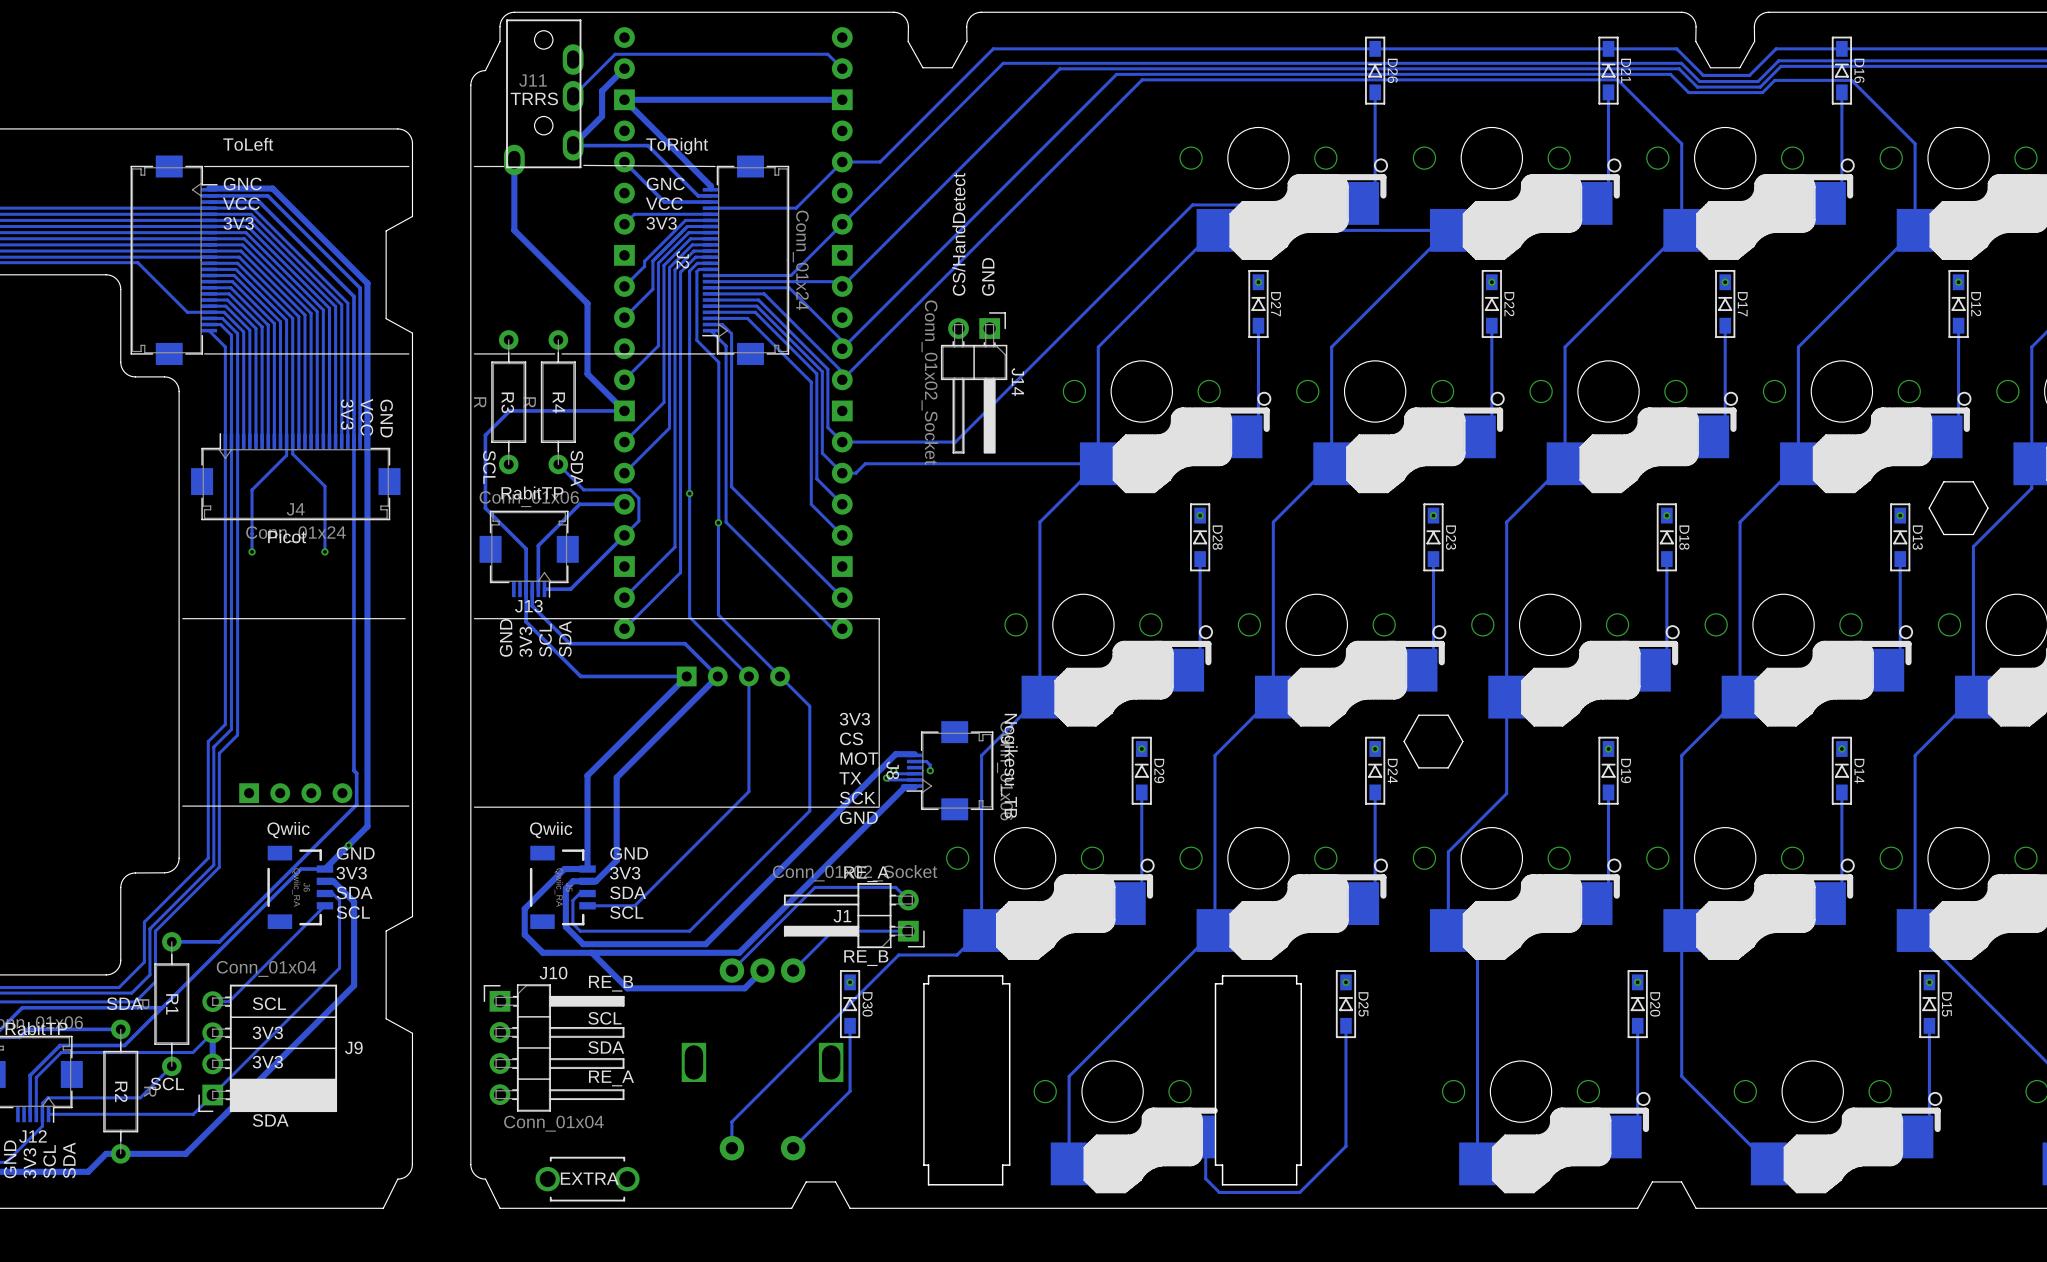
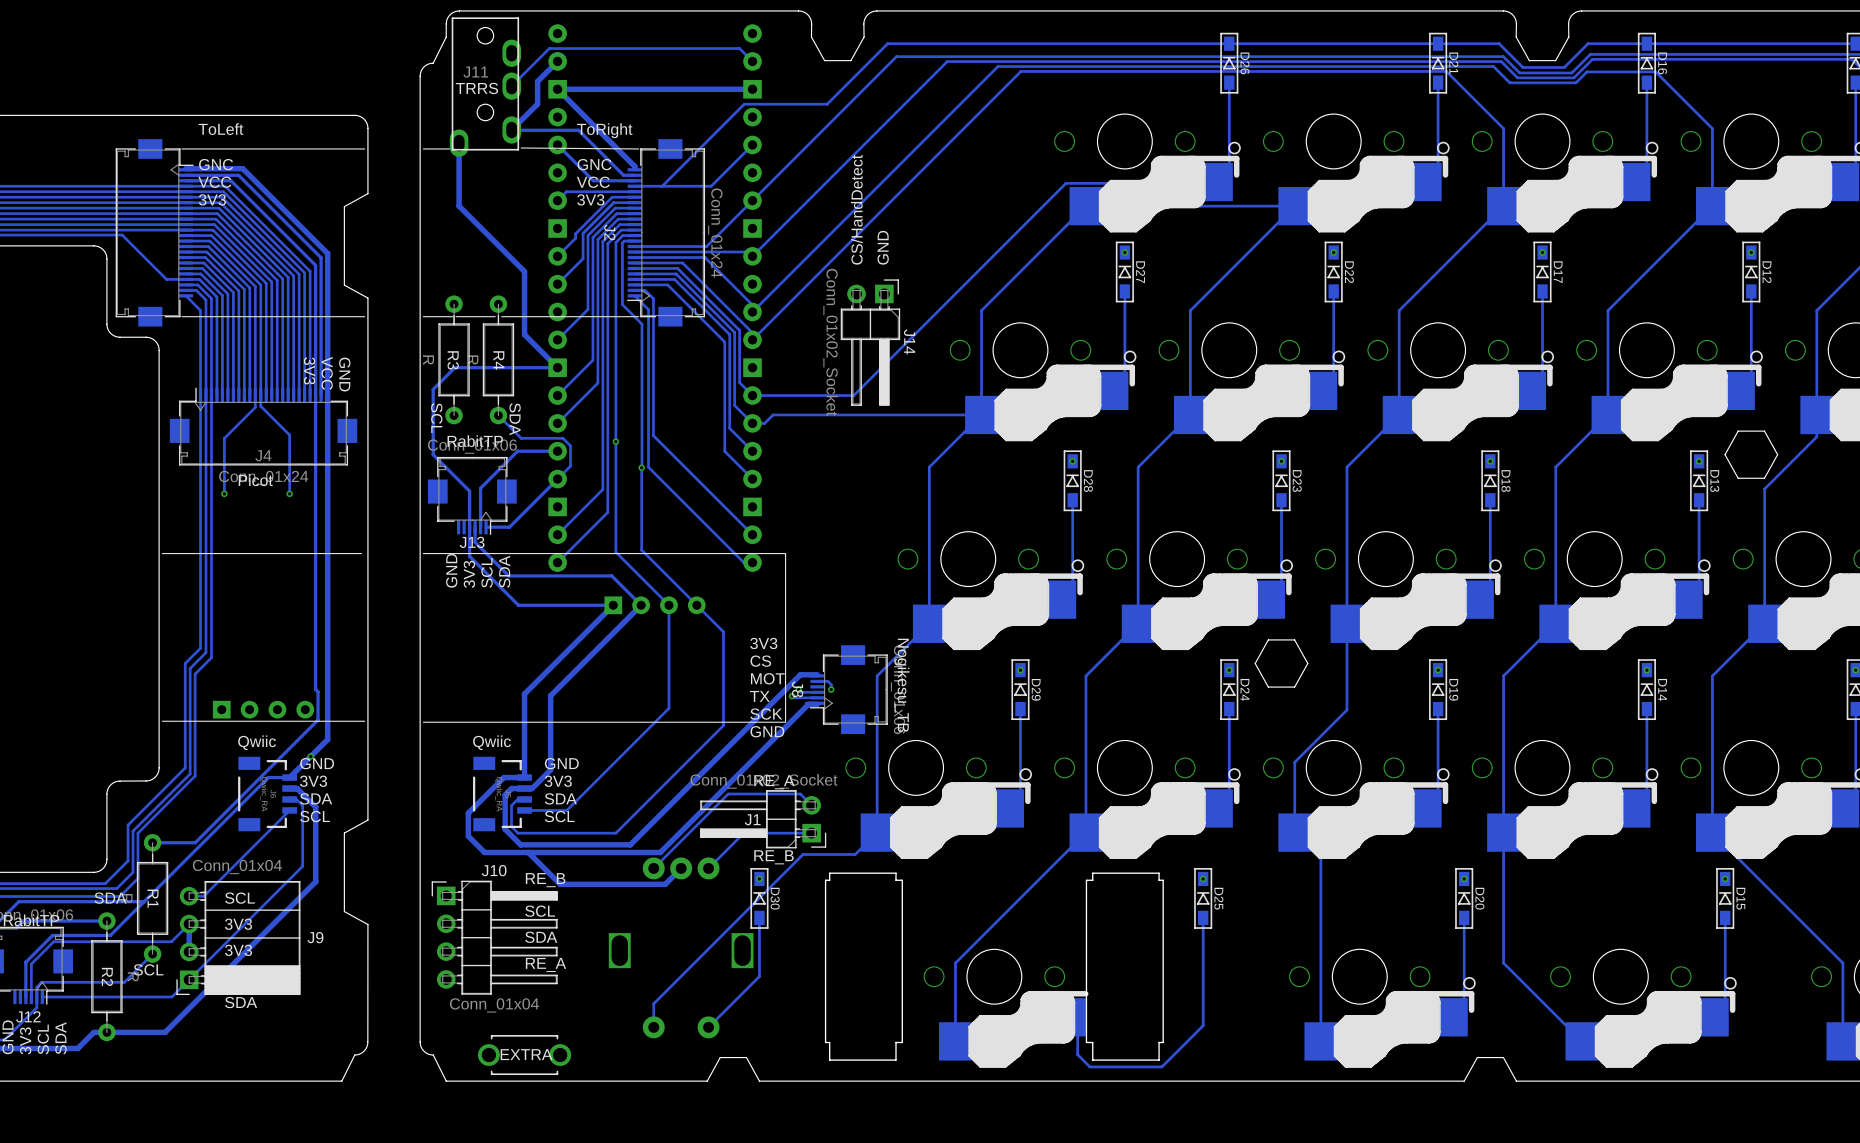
track: (925, 116) (880, 162) (842, 162) -> (827, 104) (744, 104) (662, 186)

